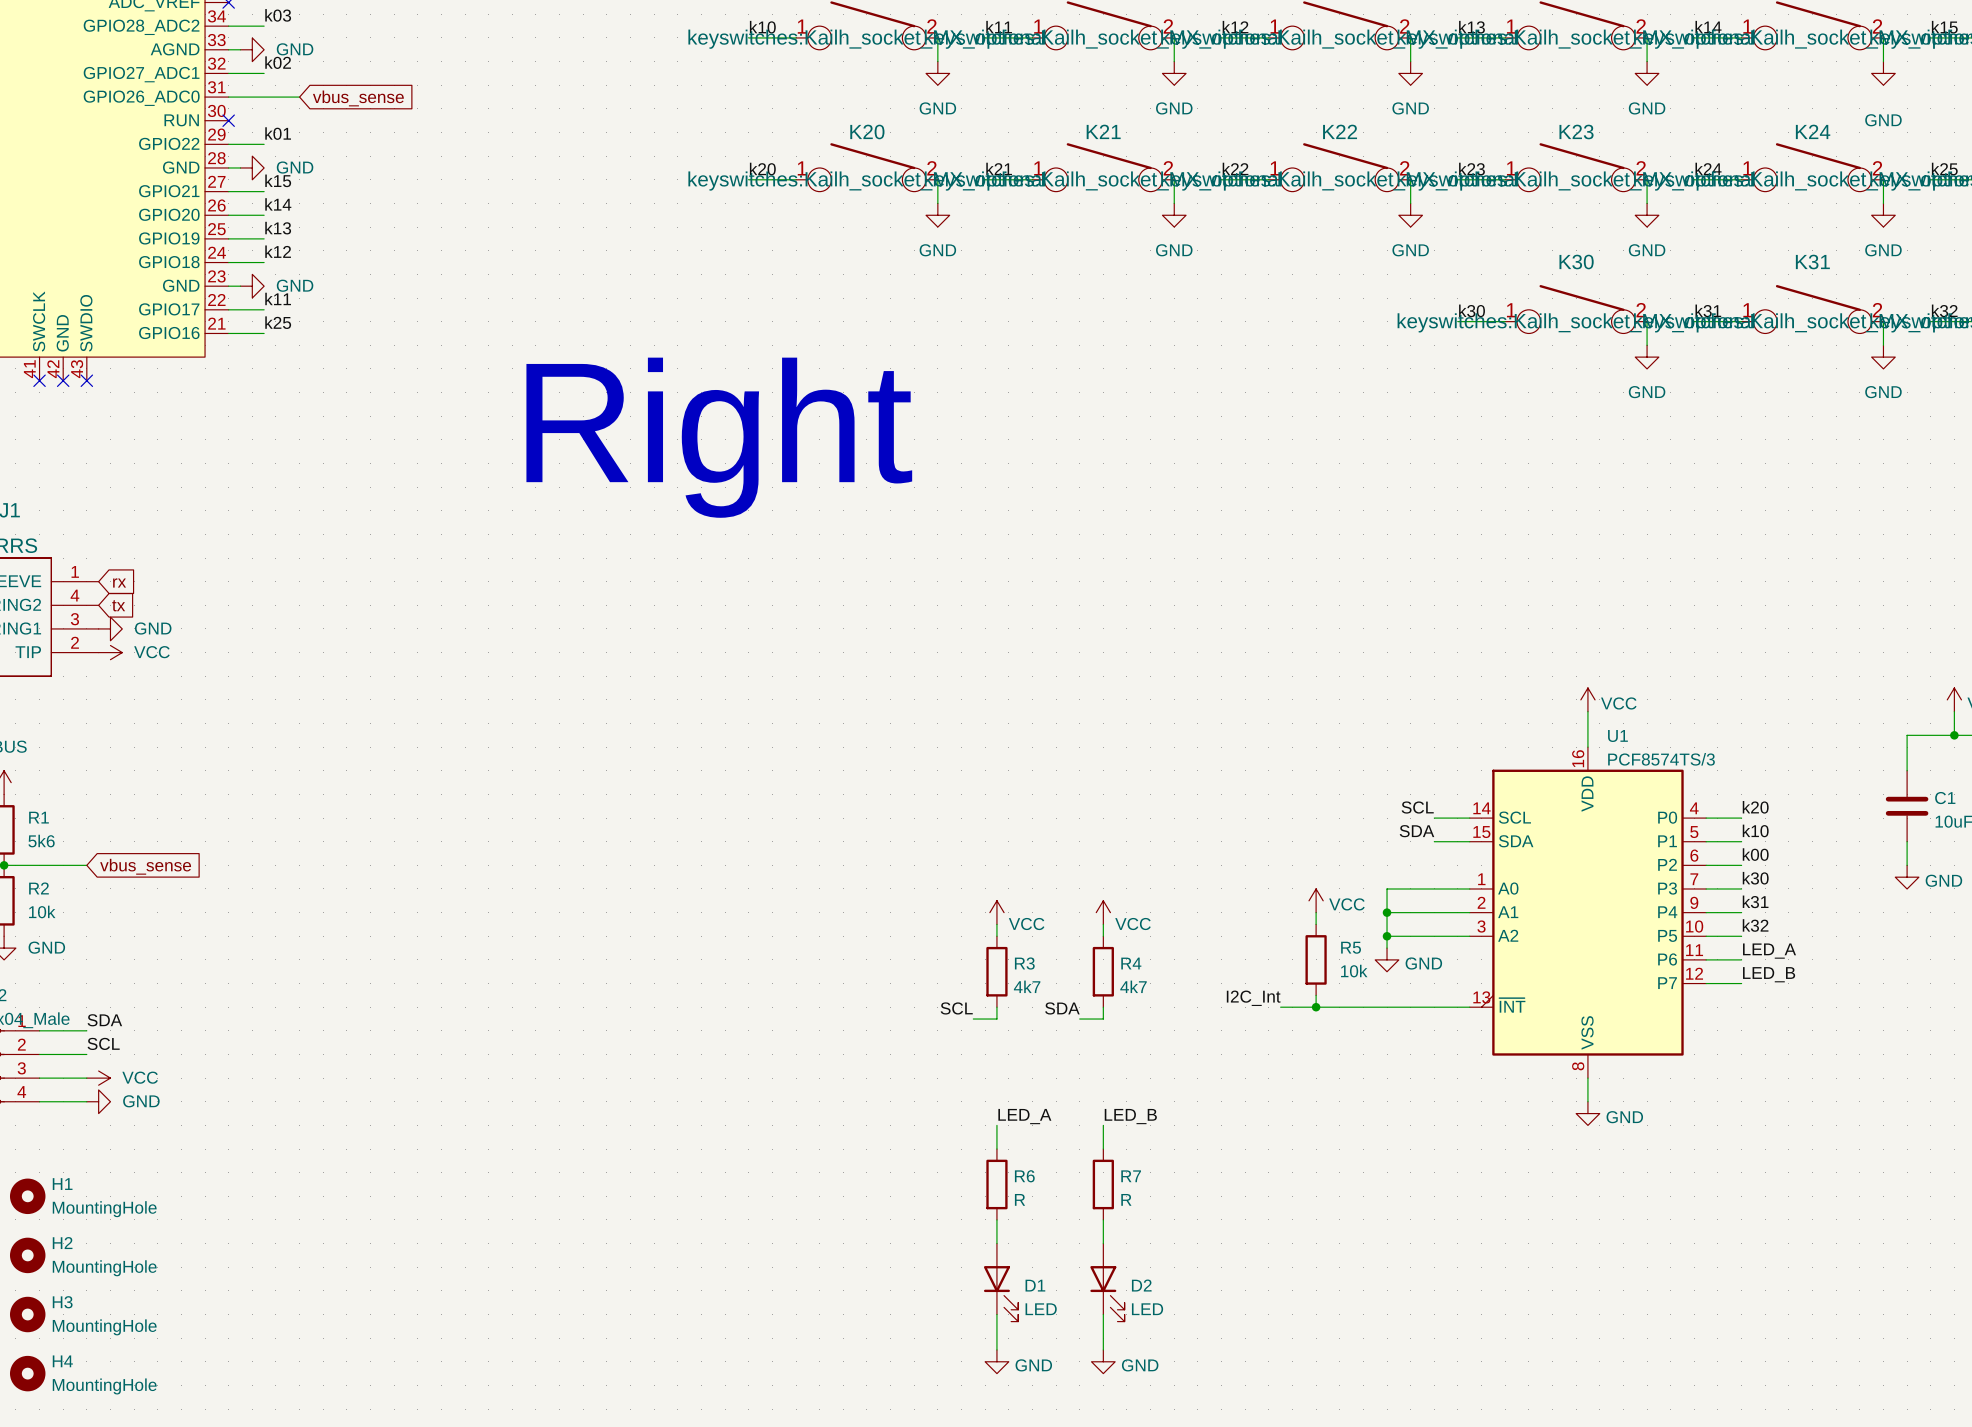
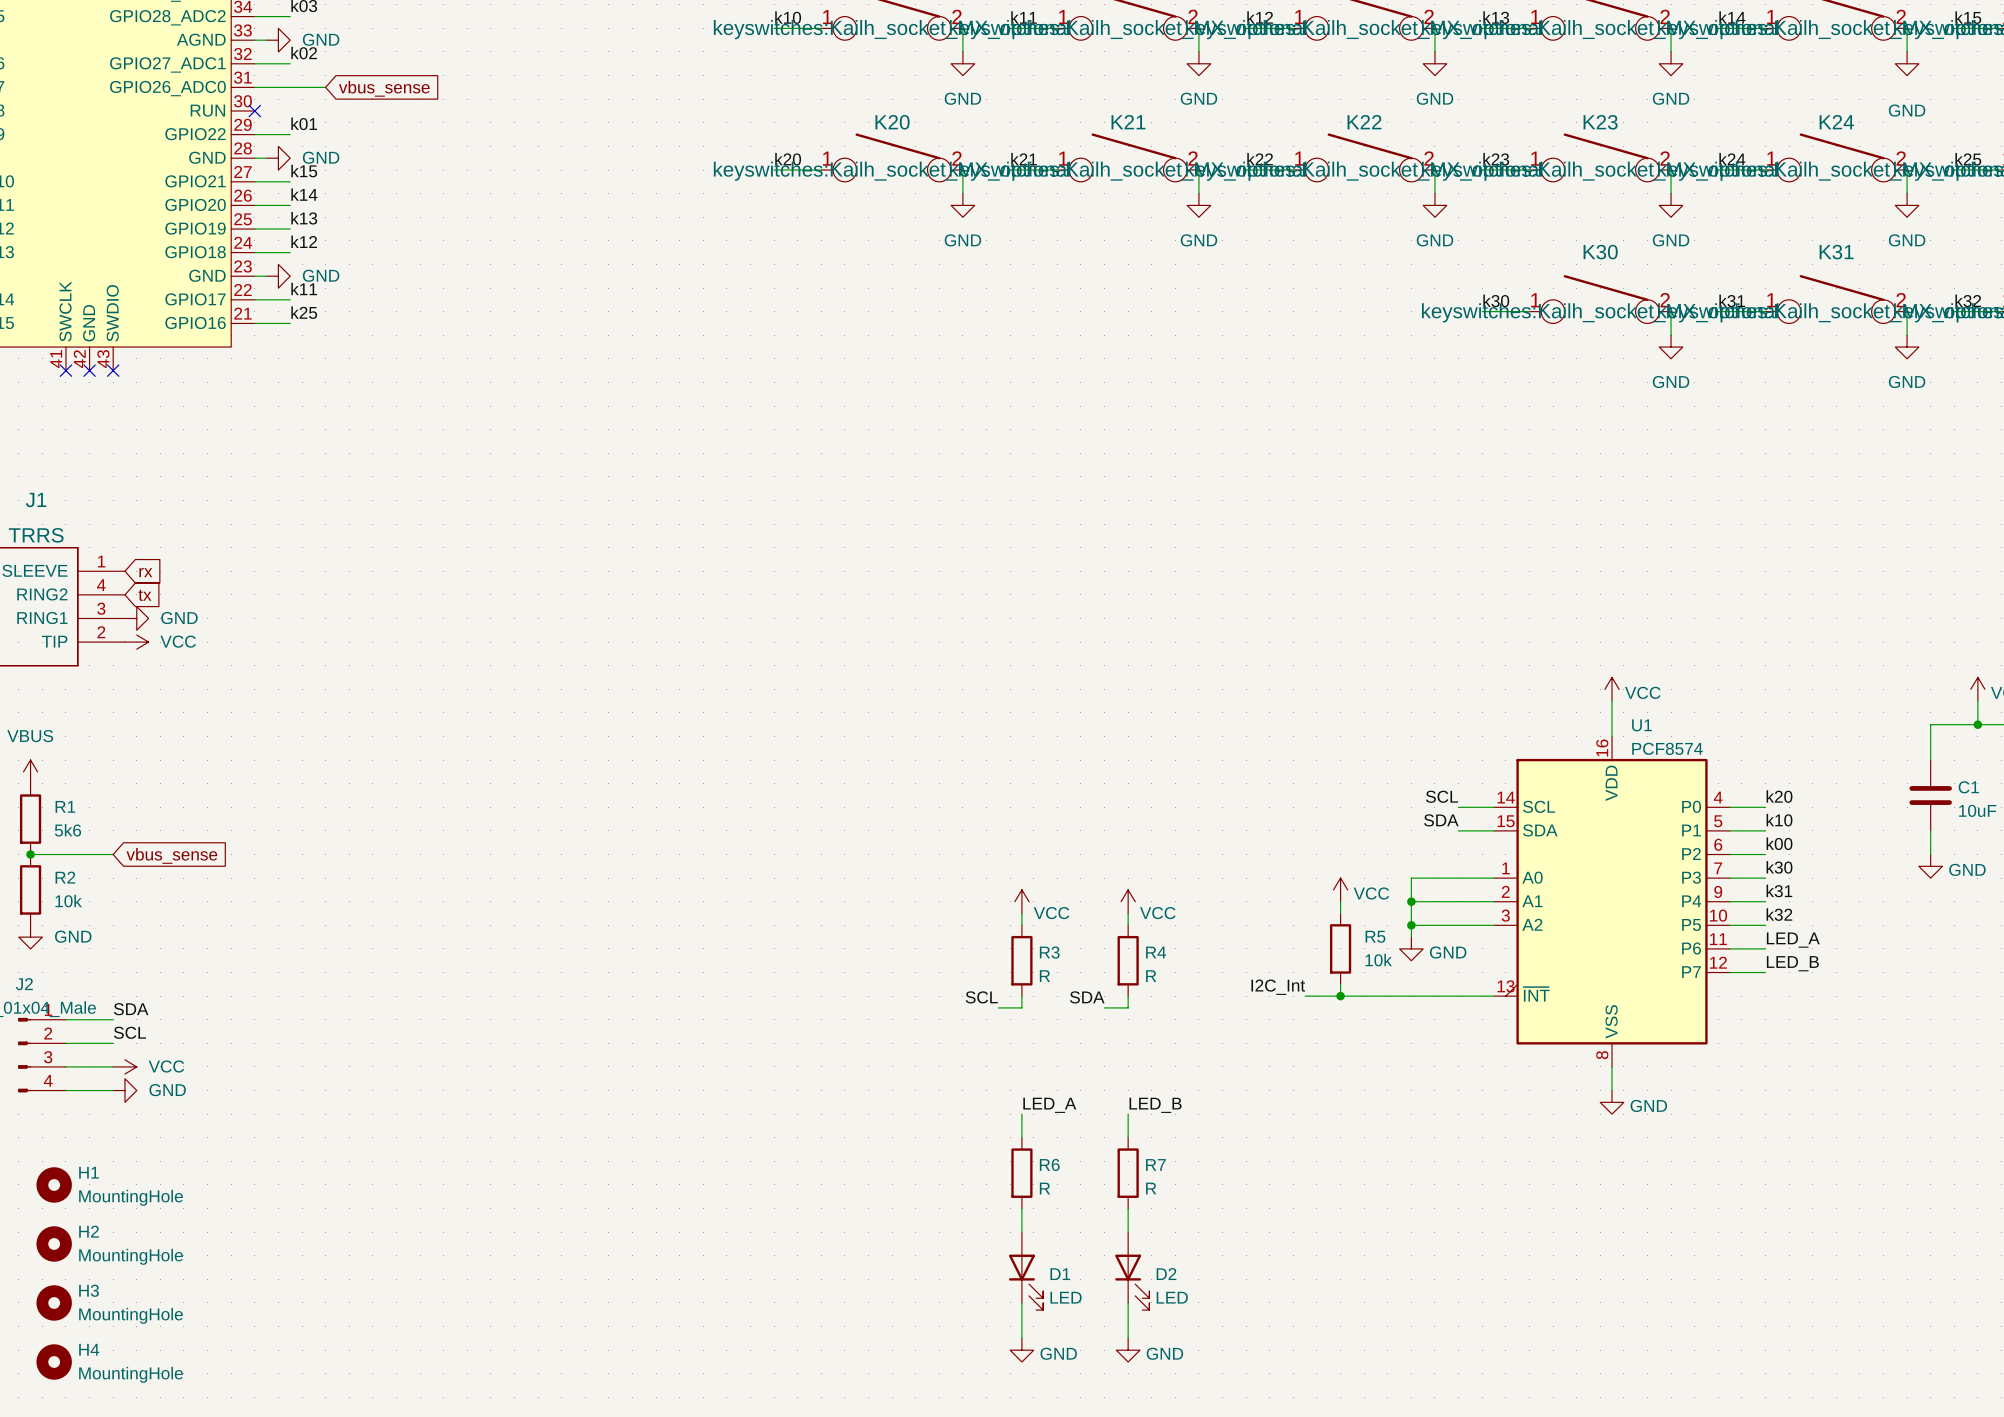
text: Right (719, 437) -> none
U1 value: PCF8574TS/3 (1661, 759) -> PCF8574 (1667, 748)
R3 value: 4k7 (1027, 986) -> R (1044, 976)
R4 value: 4k7 (1133, 986) -> R (1151, 976)

